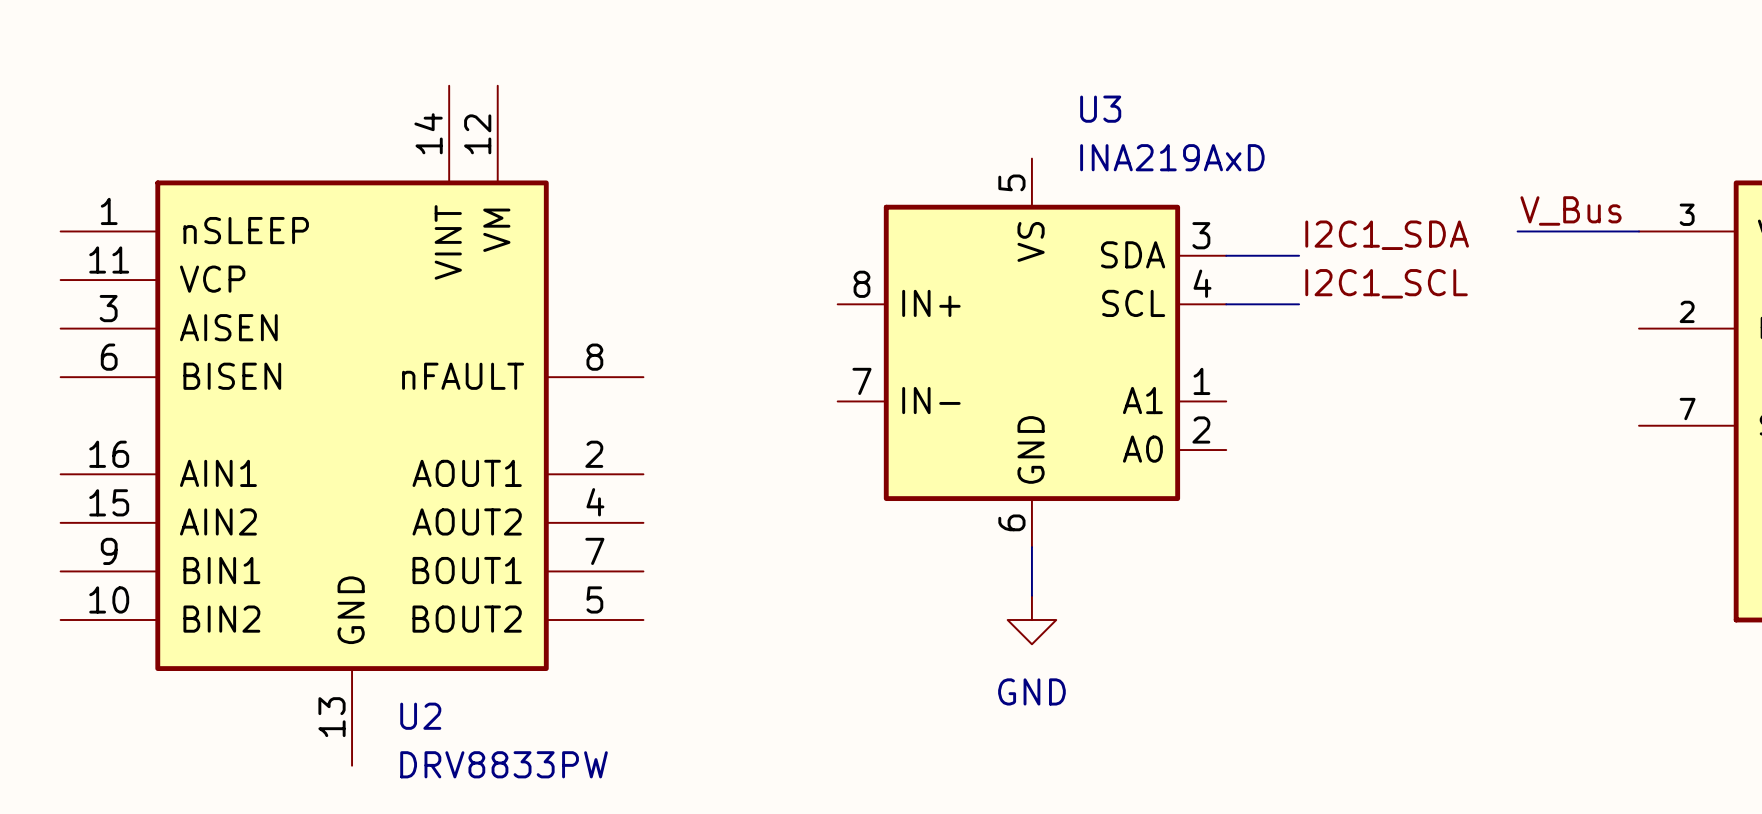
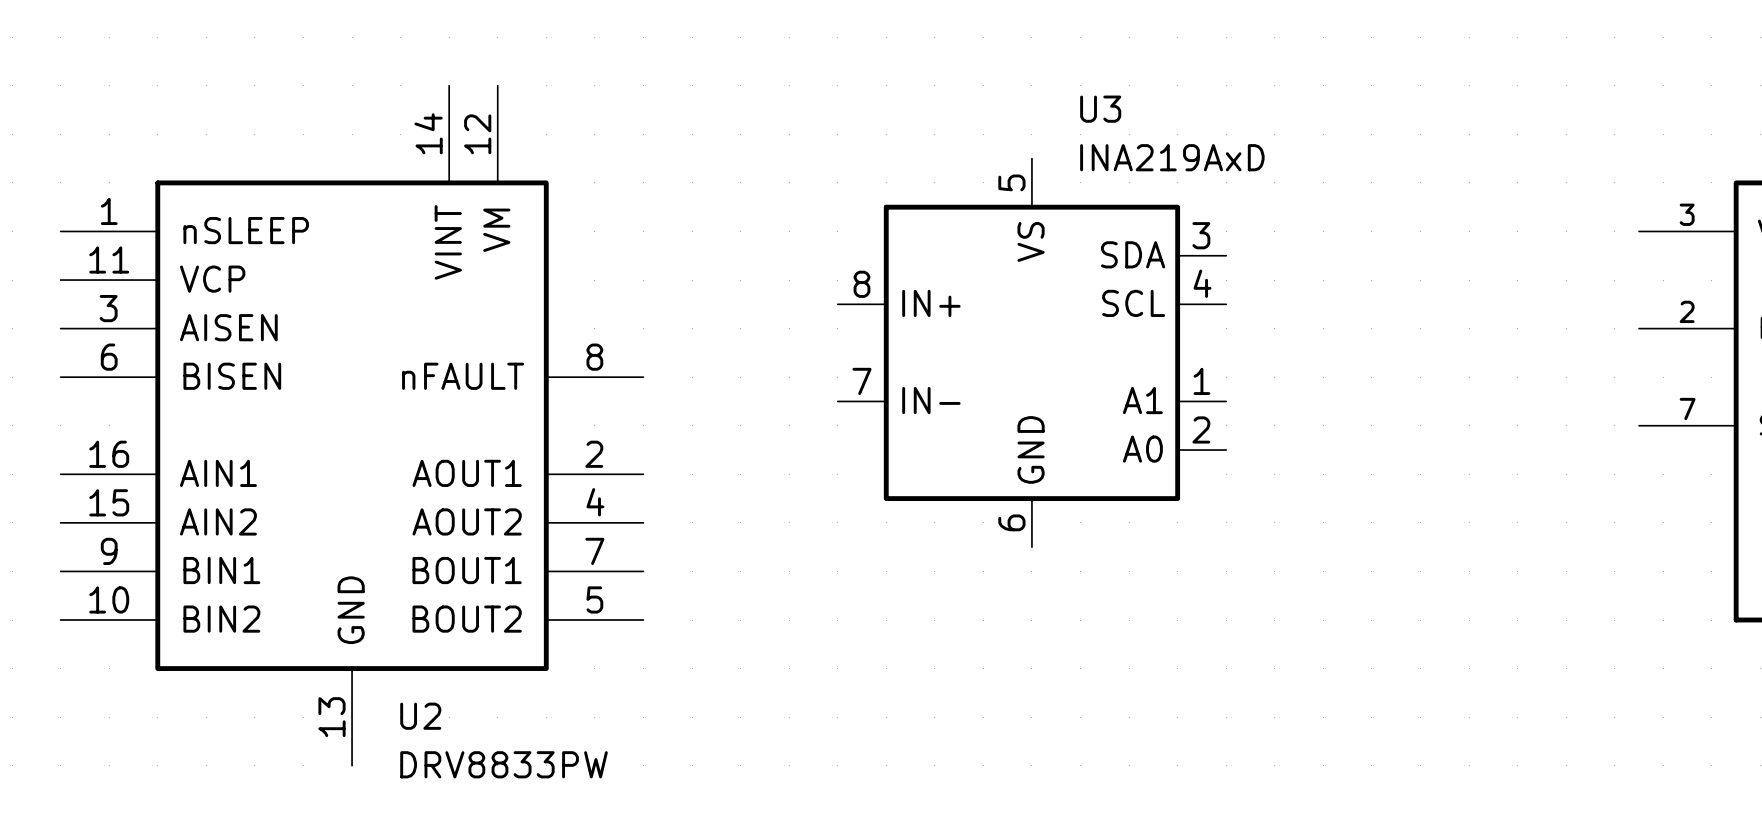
label: V_Bus (1570, 210) -> none
wire: (1517, 231) (1639, 231) -> none
label: I2C1_SDA (1387, 235) -> none
wire: (1226, 255) (1299, 255) -> none
label: I2C1_SCL (1386, 283) -> none
wire: (1226, 304) (1299, 304) -> none
wire: (1031, 547) (1031, 595) -> none
power symbol: GND (1031, 620) -> none

